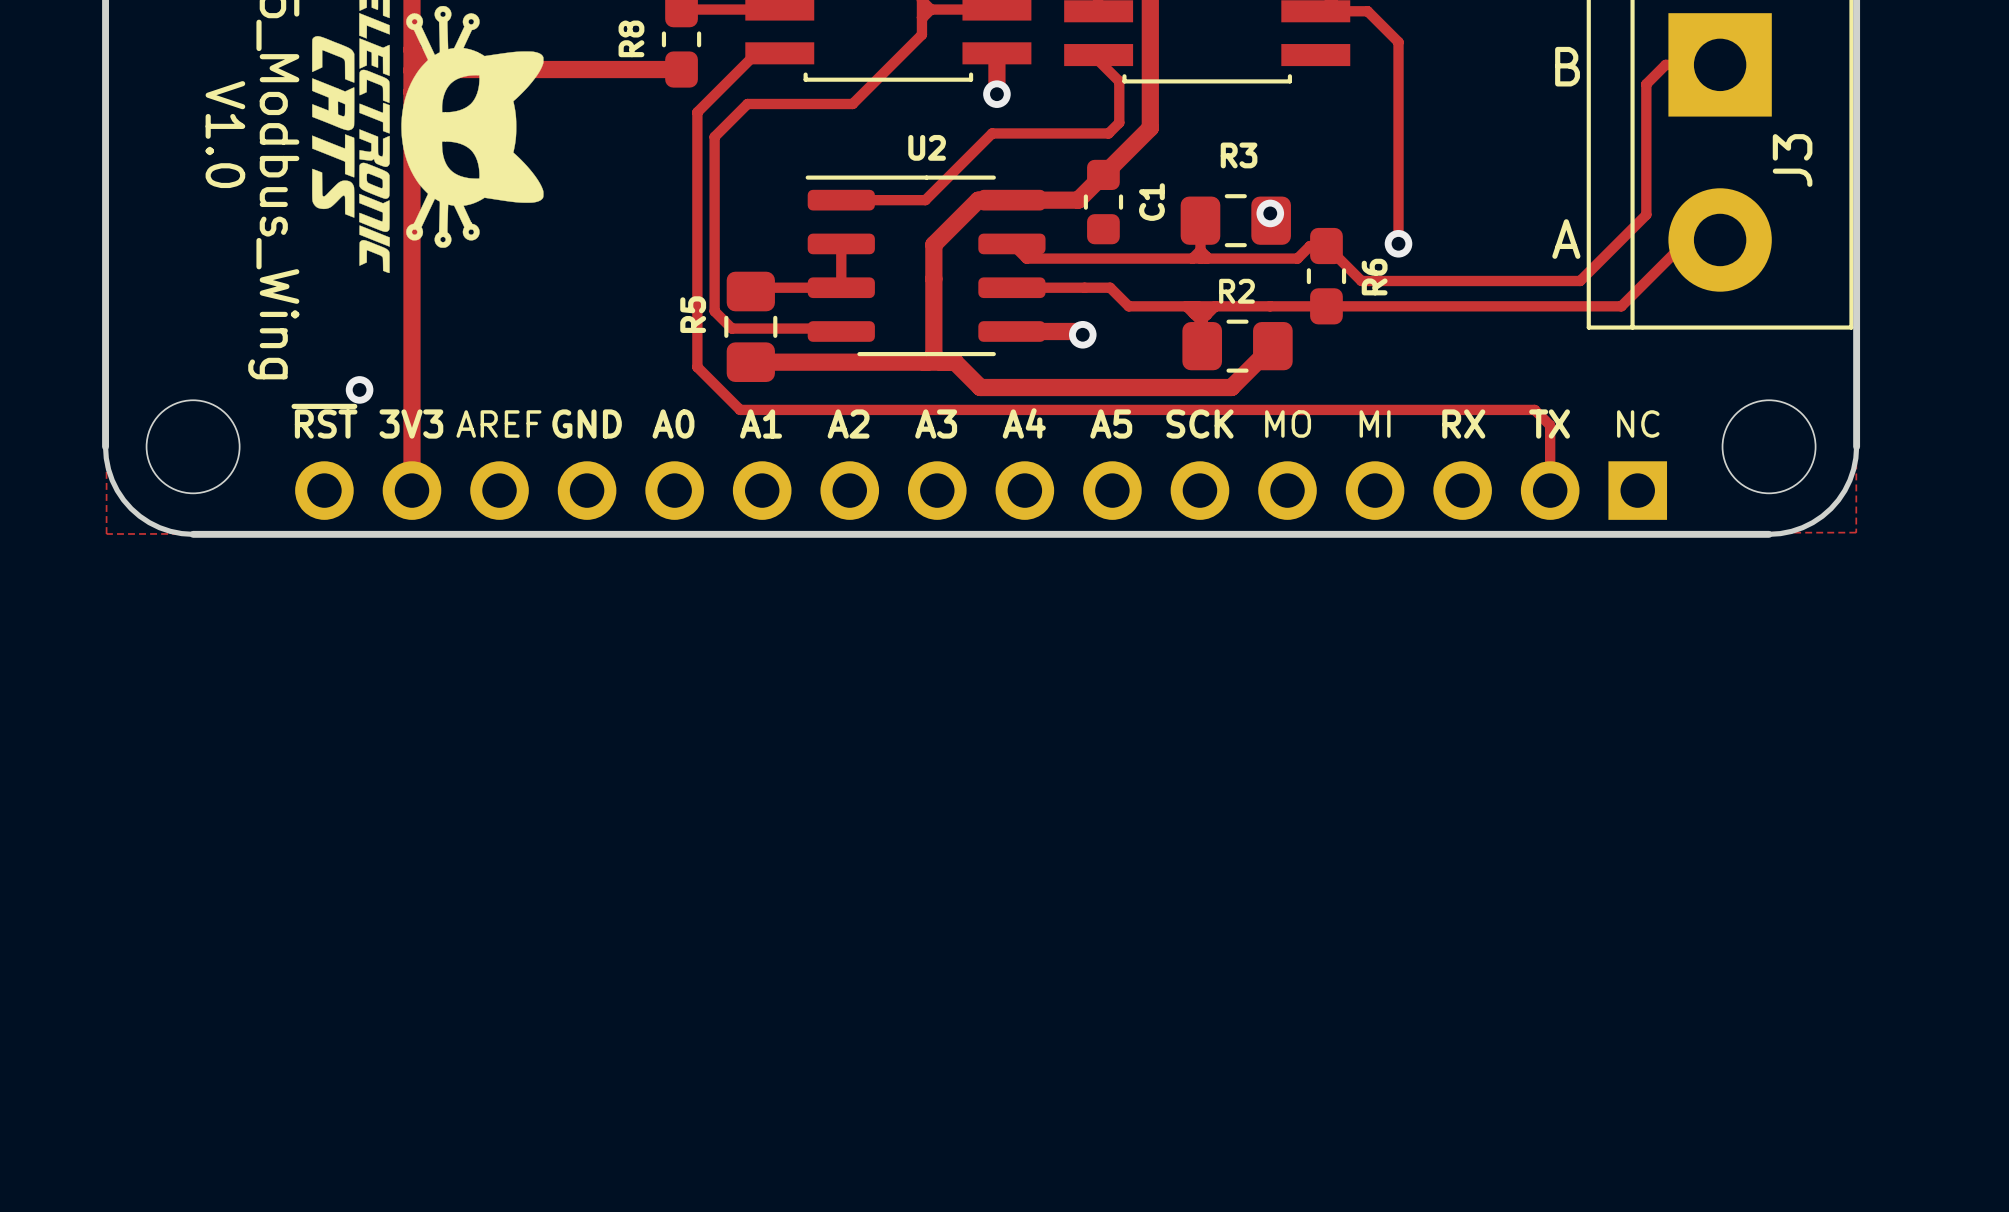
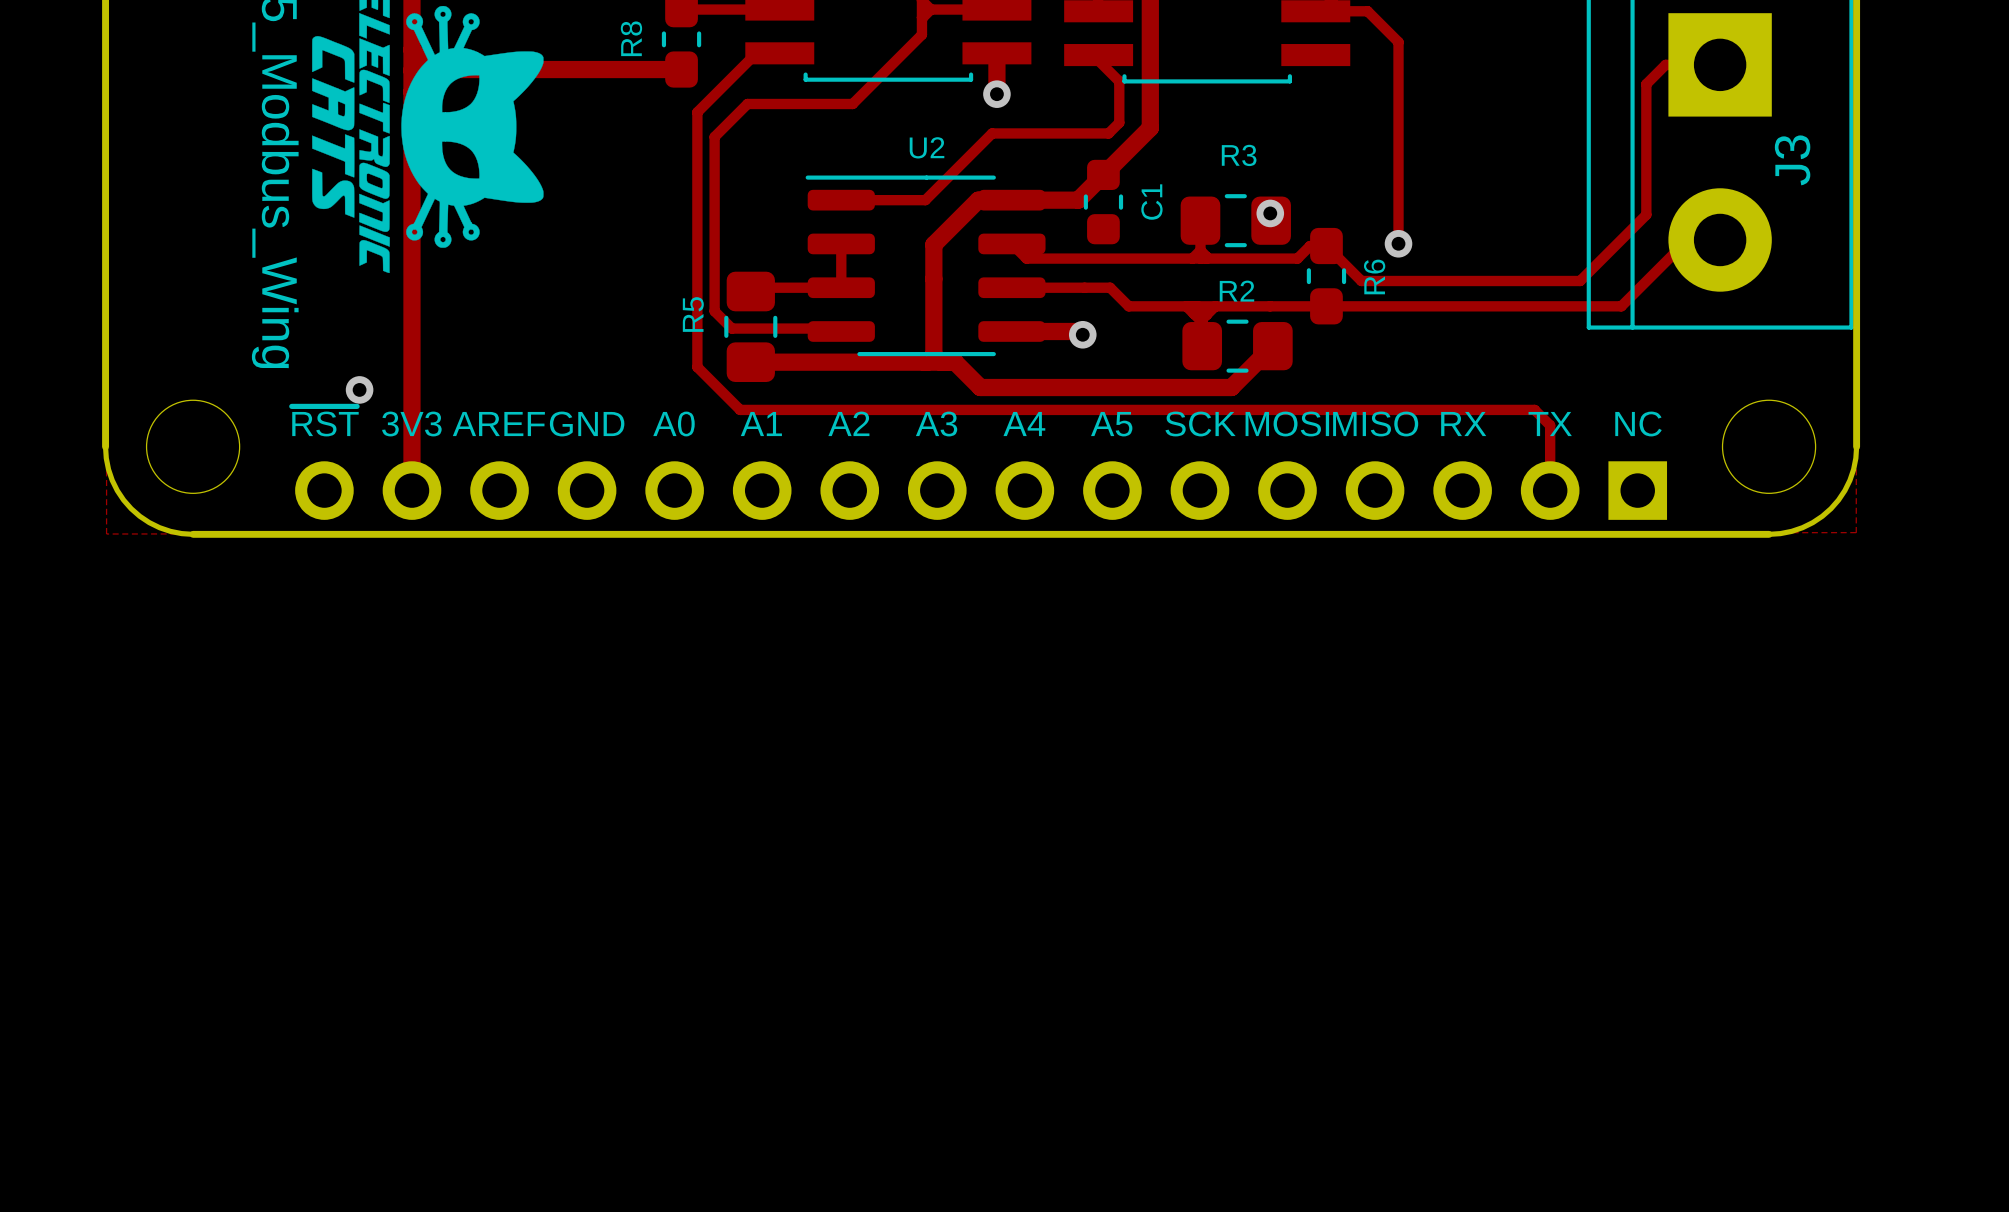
text: B (1567, 66) -> none
text: V1.0 (225, 134) -> none
text: A (1566, 239) -> none
text: MO (1288, 424) -> MOSI (1287, 424)
text: MI (1375, 424) -> MISO (1375, 424)

